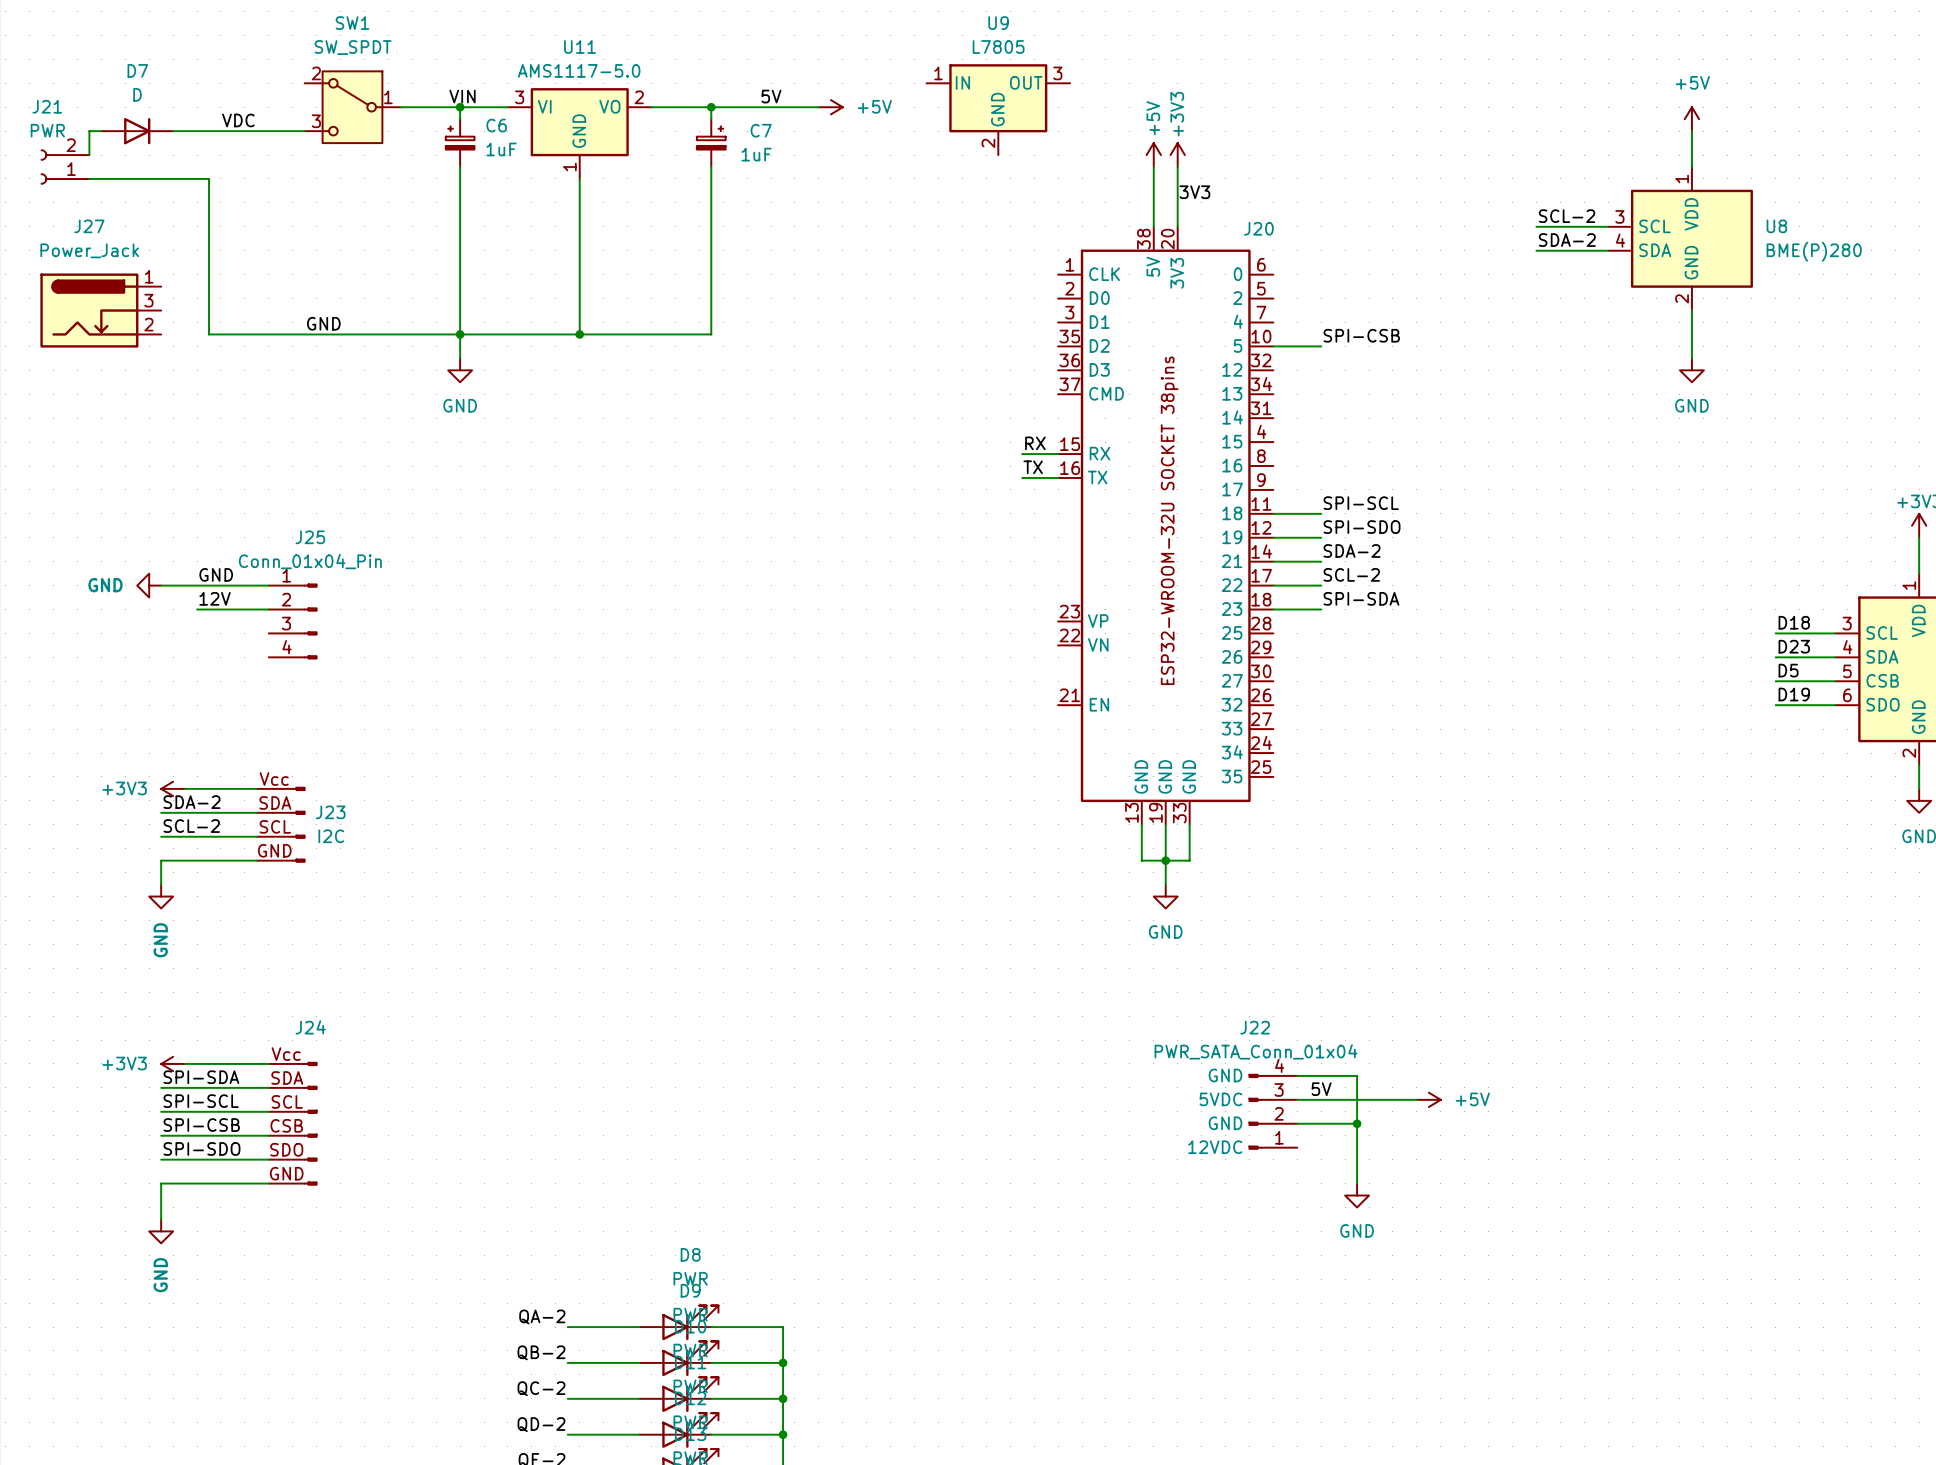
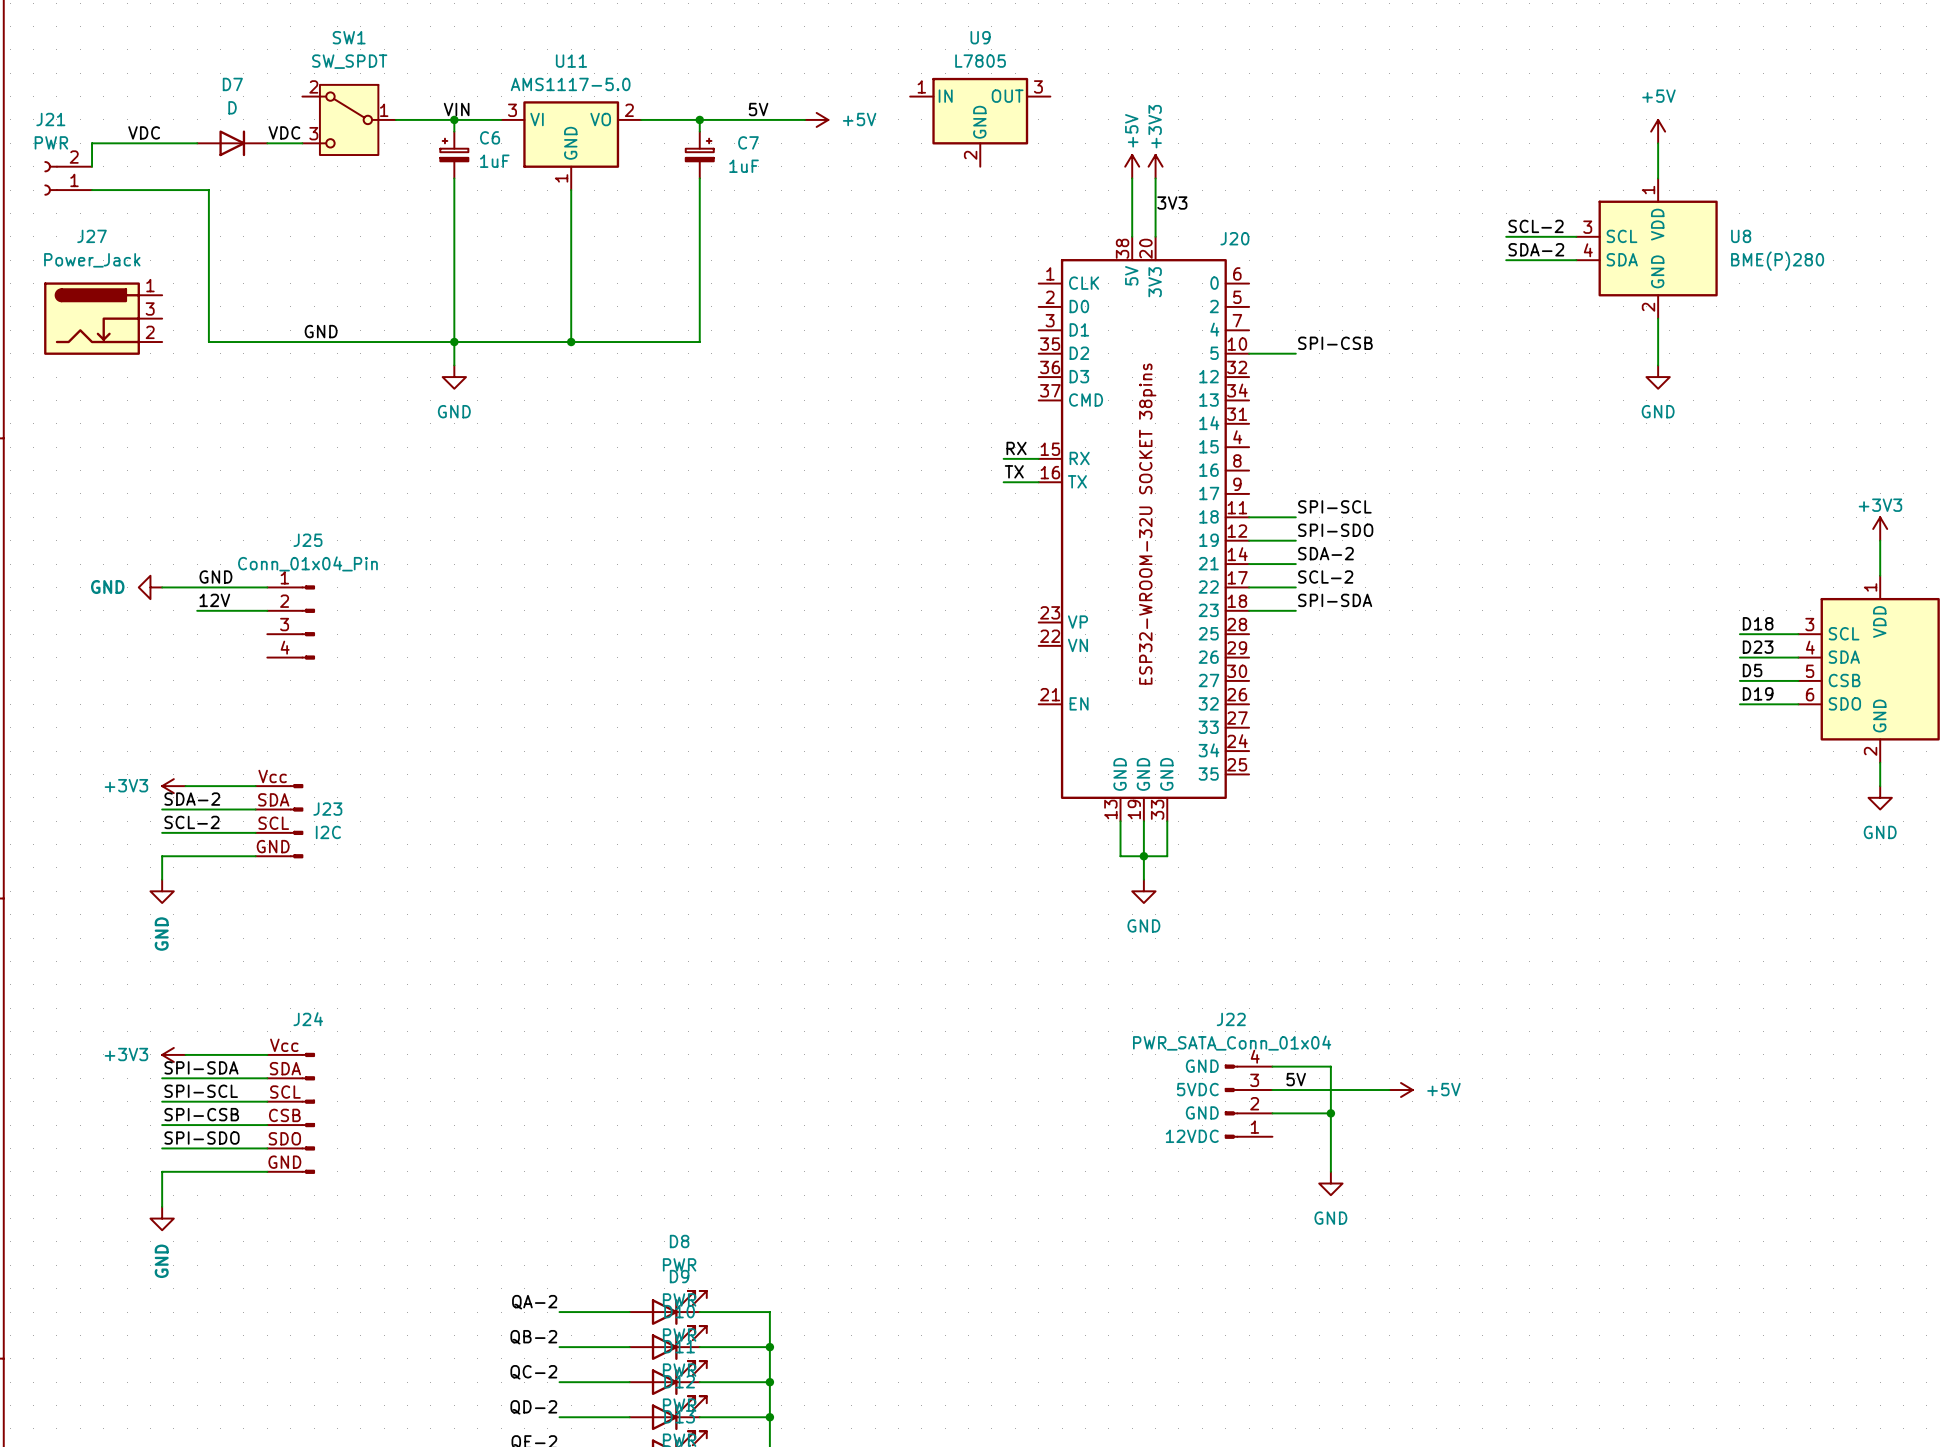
label: none -> VDC (144, 132)
label: VDC (238, 120) -> none
label: none -> VDC (284, 132)
D7 position: (137, 131) -> (232, 143)

